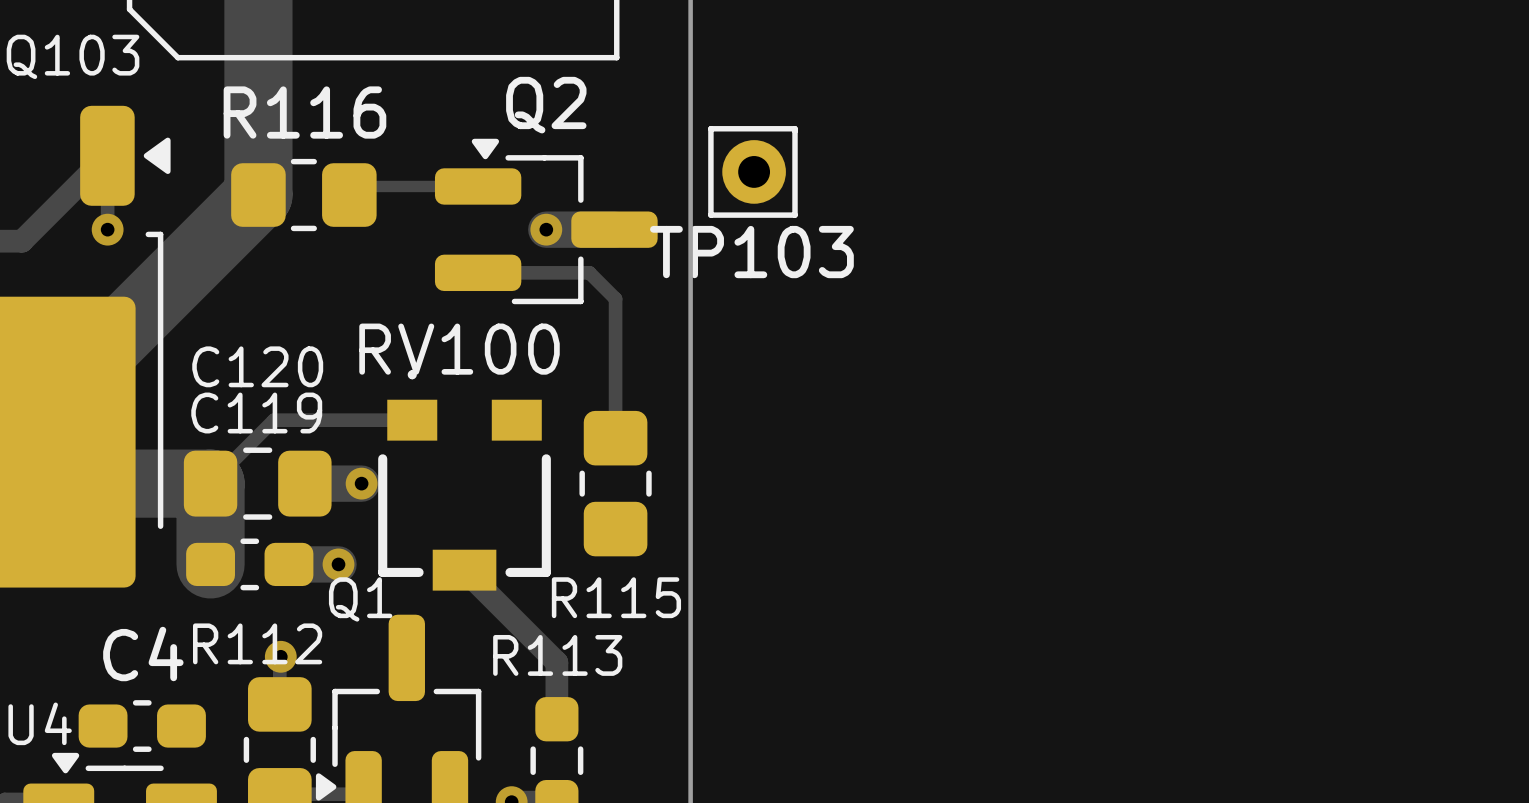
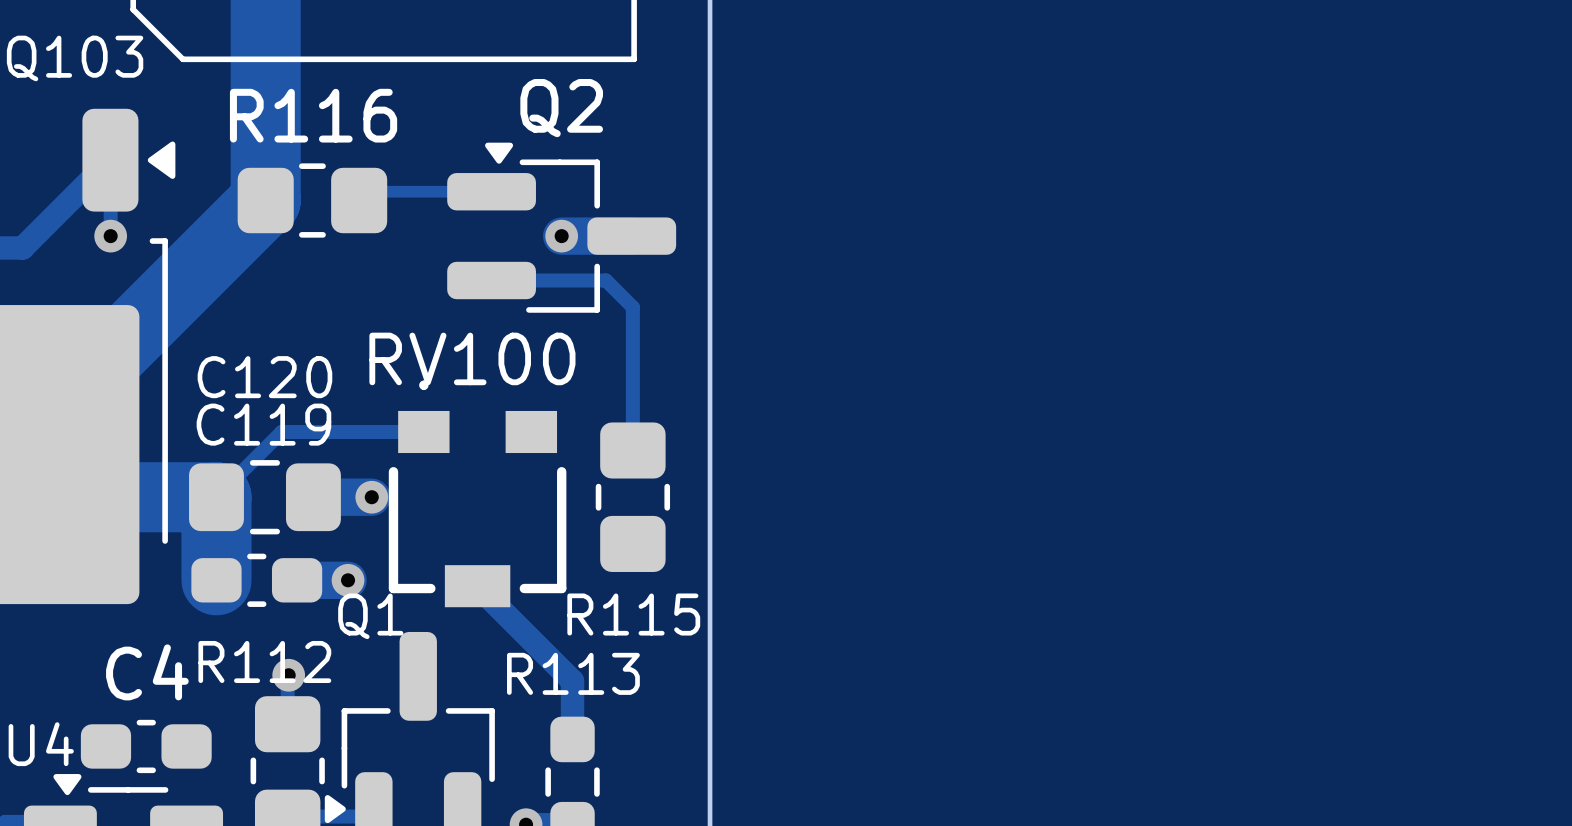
TP103: (752, 171) -> none

